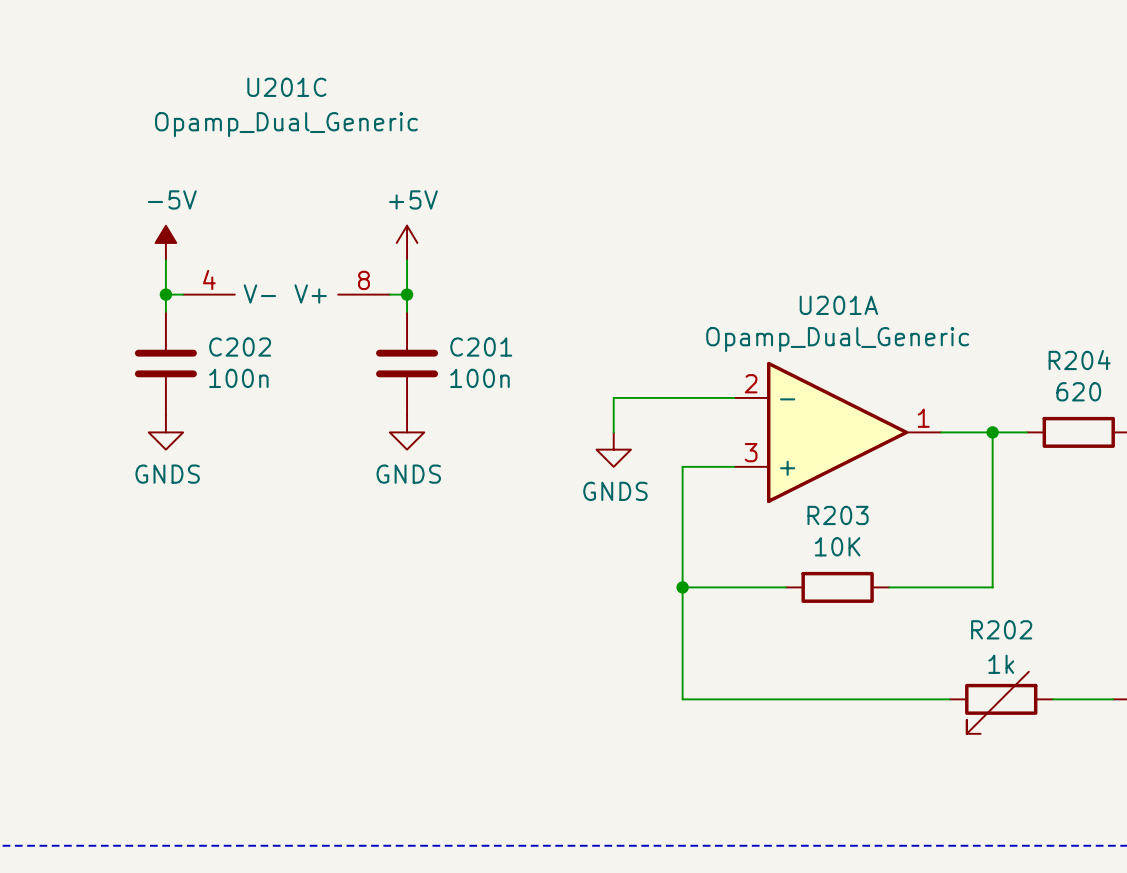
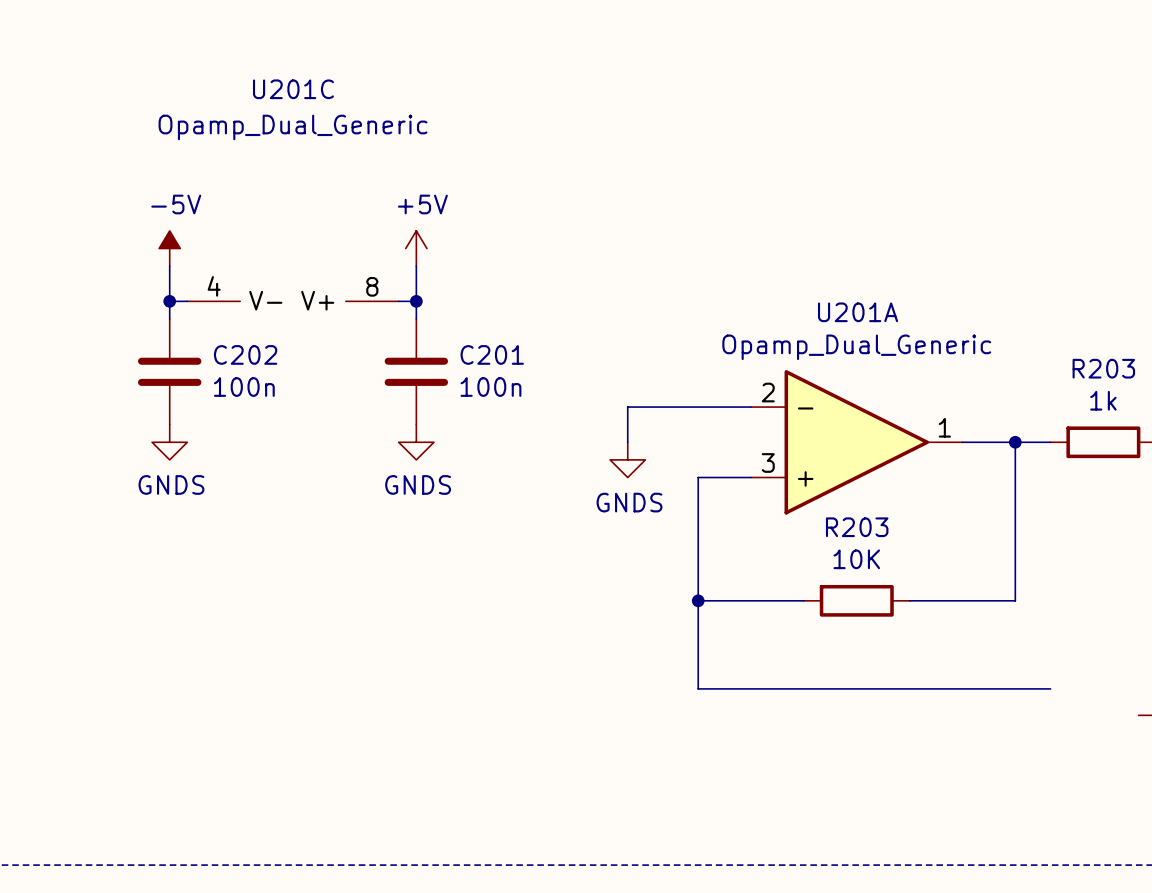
R204 name: R204 (1079, 360) -> R203 (1103, 368)
R204 value: 620 (1078, 391) -> 1k (1103, 400)
wire: (682, 673) (682, 699) (949, 699) -> (698, 688) (1050, 688)
wire: (1052, 699) (1113, 699) -> none
R202: 1k (1001, 702) -> none

